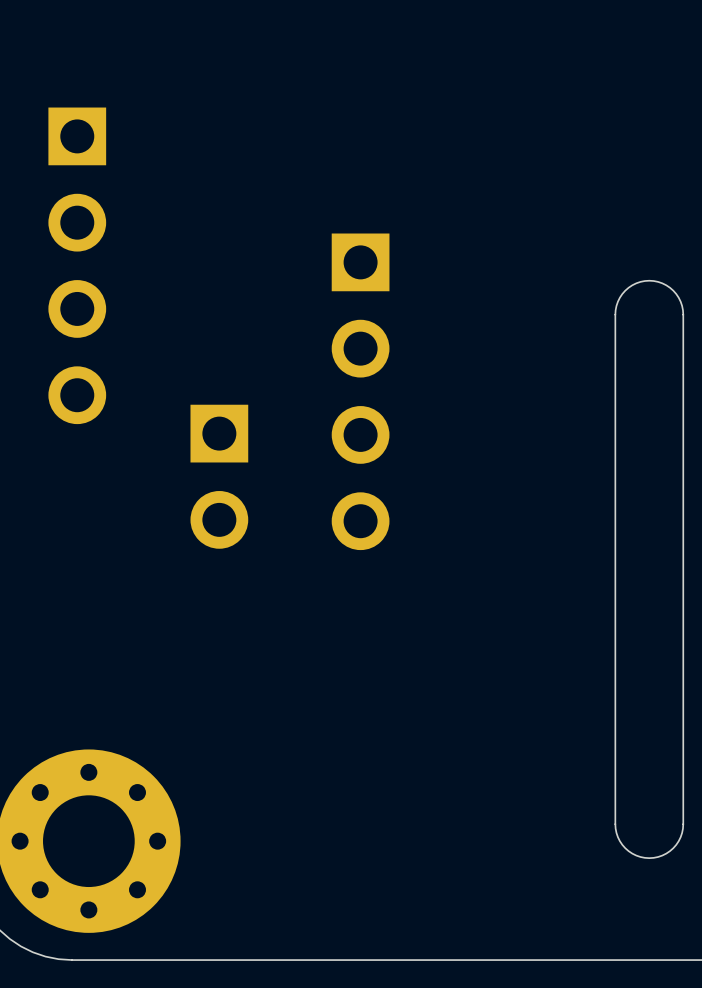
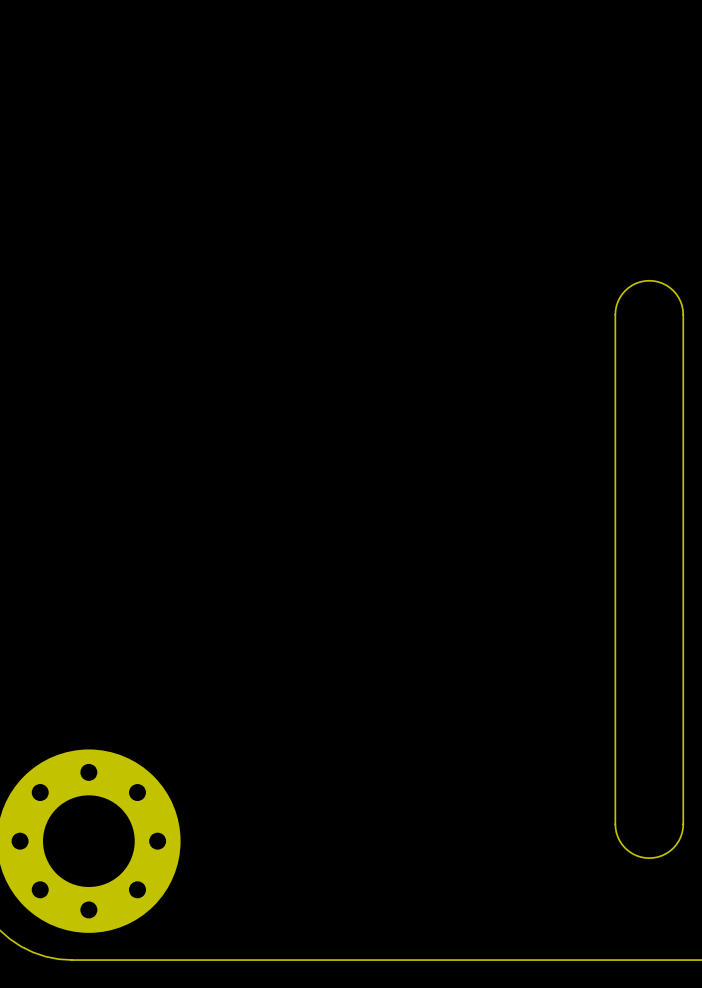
part: (77, 265) -> none
part: (360, 391) -> none
part: (219, 476) -> none

